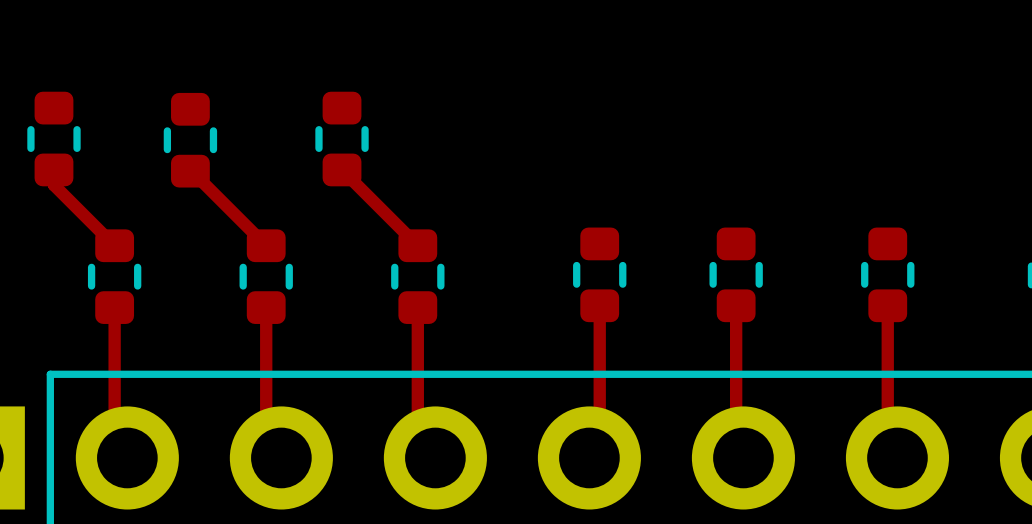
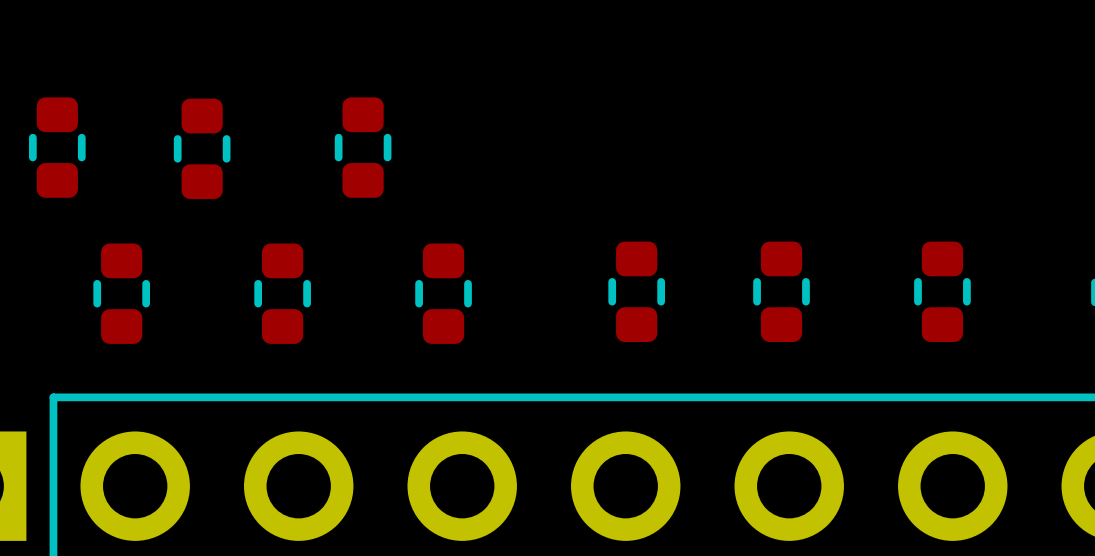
top track: (53, 169) (53, 185) (114, 245) -> none
top track: (342, 169) (417, 245) -> none
top track: (191, 171) (266, 245) -> none
top track: (599, 305) (599, 447) (589, 457) -> none
top track: (736, 305) (736, 450) (743, 457) -> none
top track: (887, 305) (887, 448) (897, 457) -> none
top track: (114, 307) (114, 445) (127, 457) -> none
top track: (266, 307) (266, 442) (281, 457) -> none
top track: (417, 307) (417, 440) (435, 457) -> none

